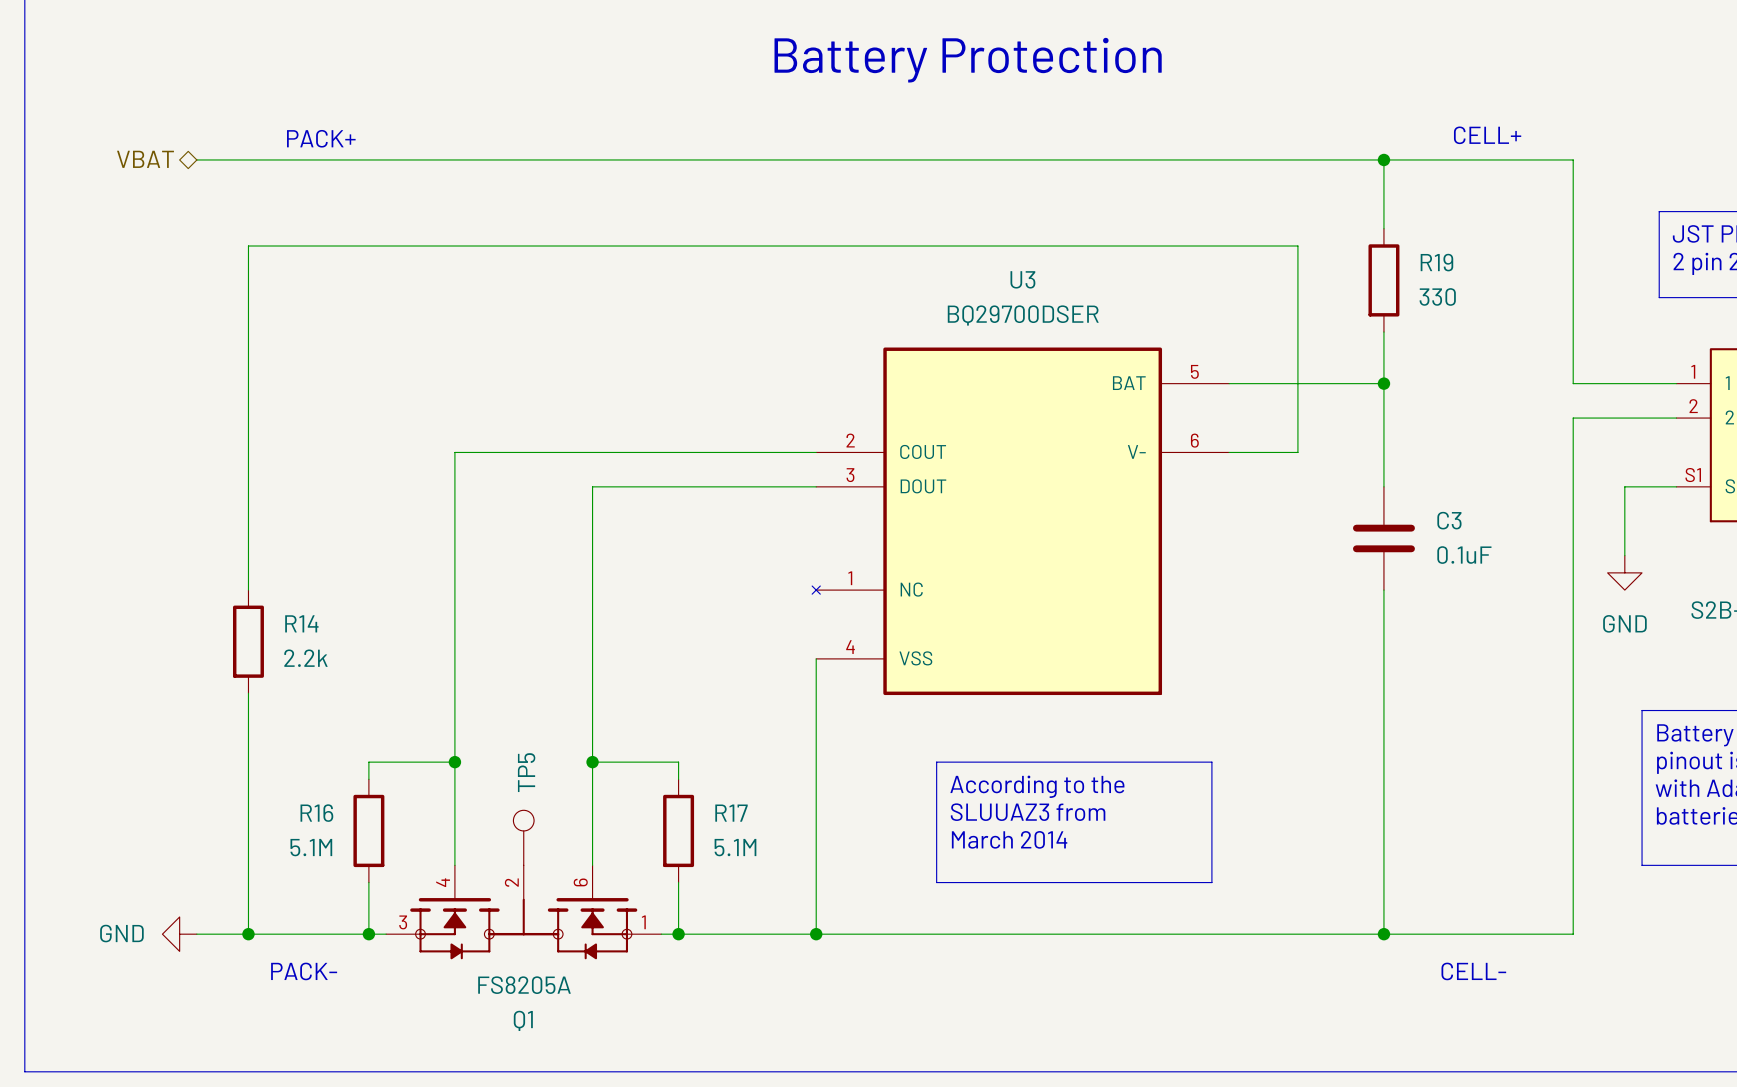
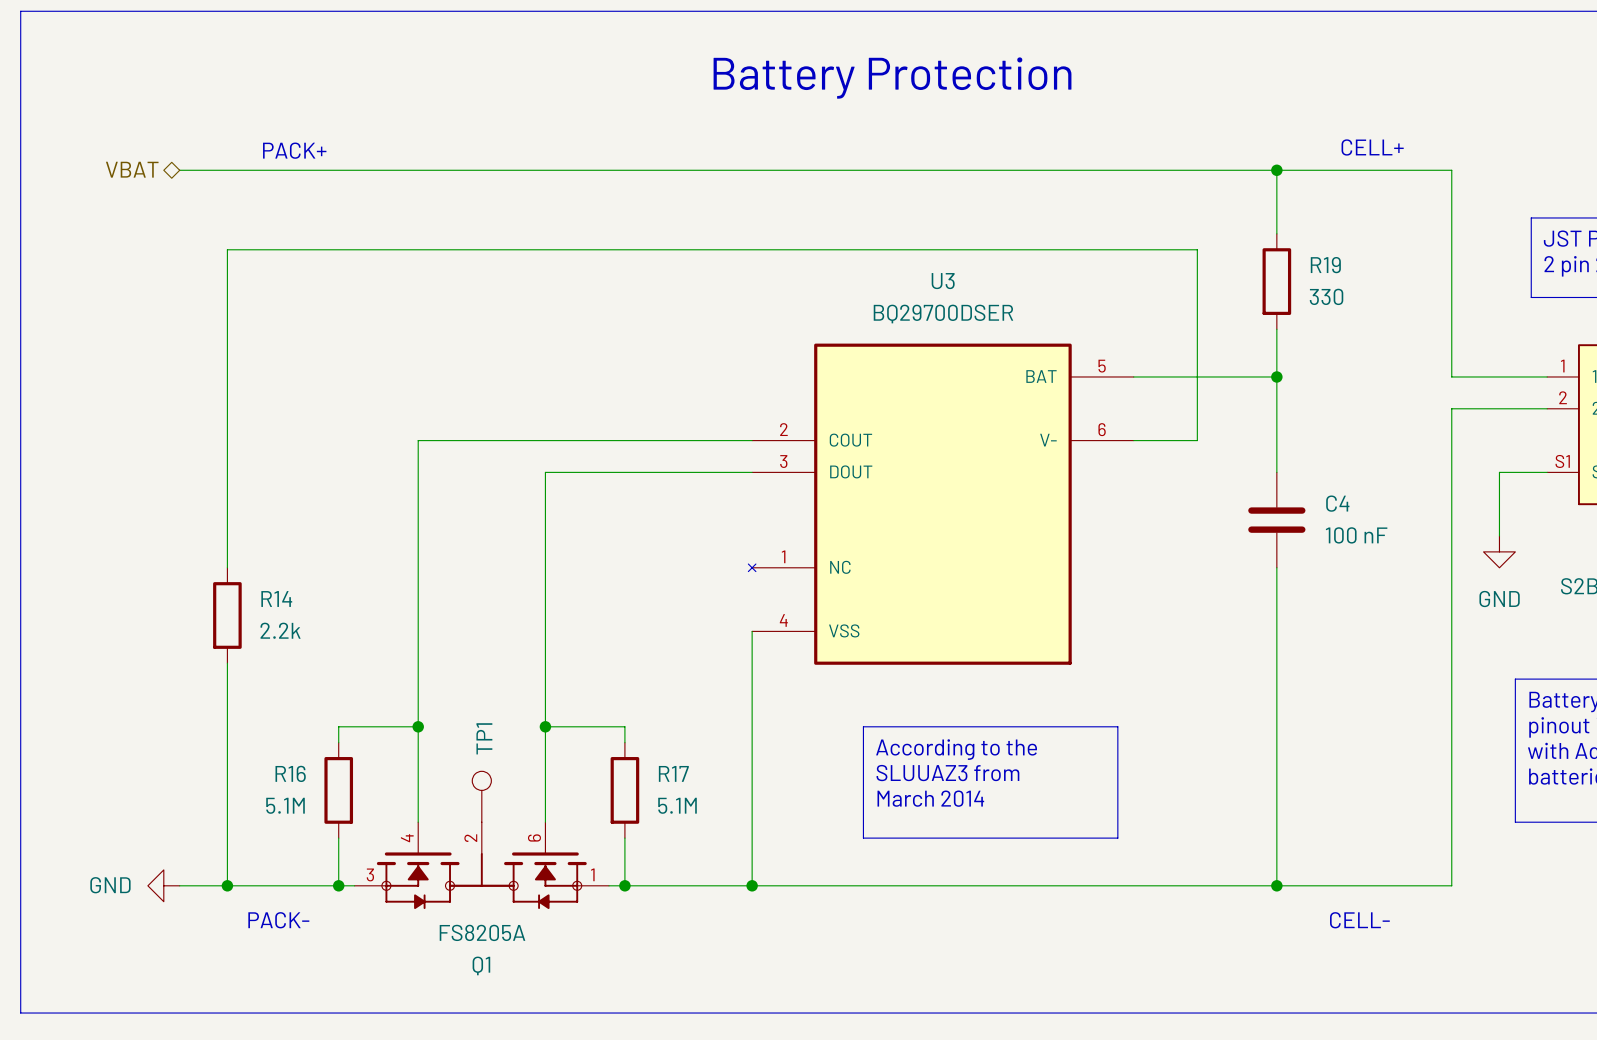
C3 name: C3 (1449, 520) -> C4 (1337, 503)
C3 value: 0.1uF (1464, 555) -> 100 nF (1356, 535)
TP5 name: TP5 (526, 772) -> TP1 (484, 738)

